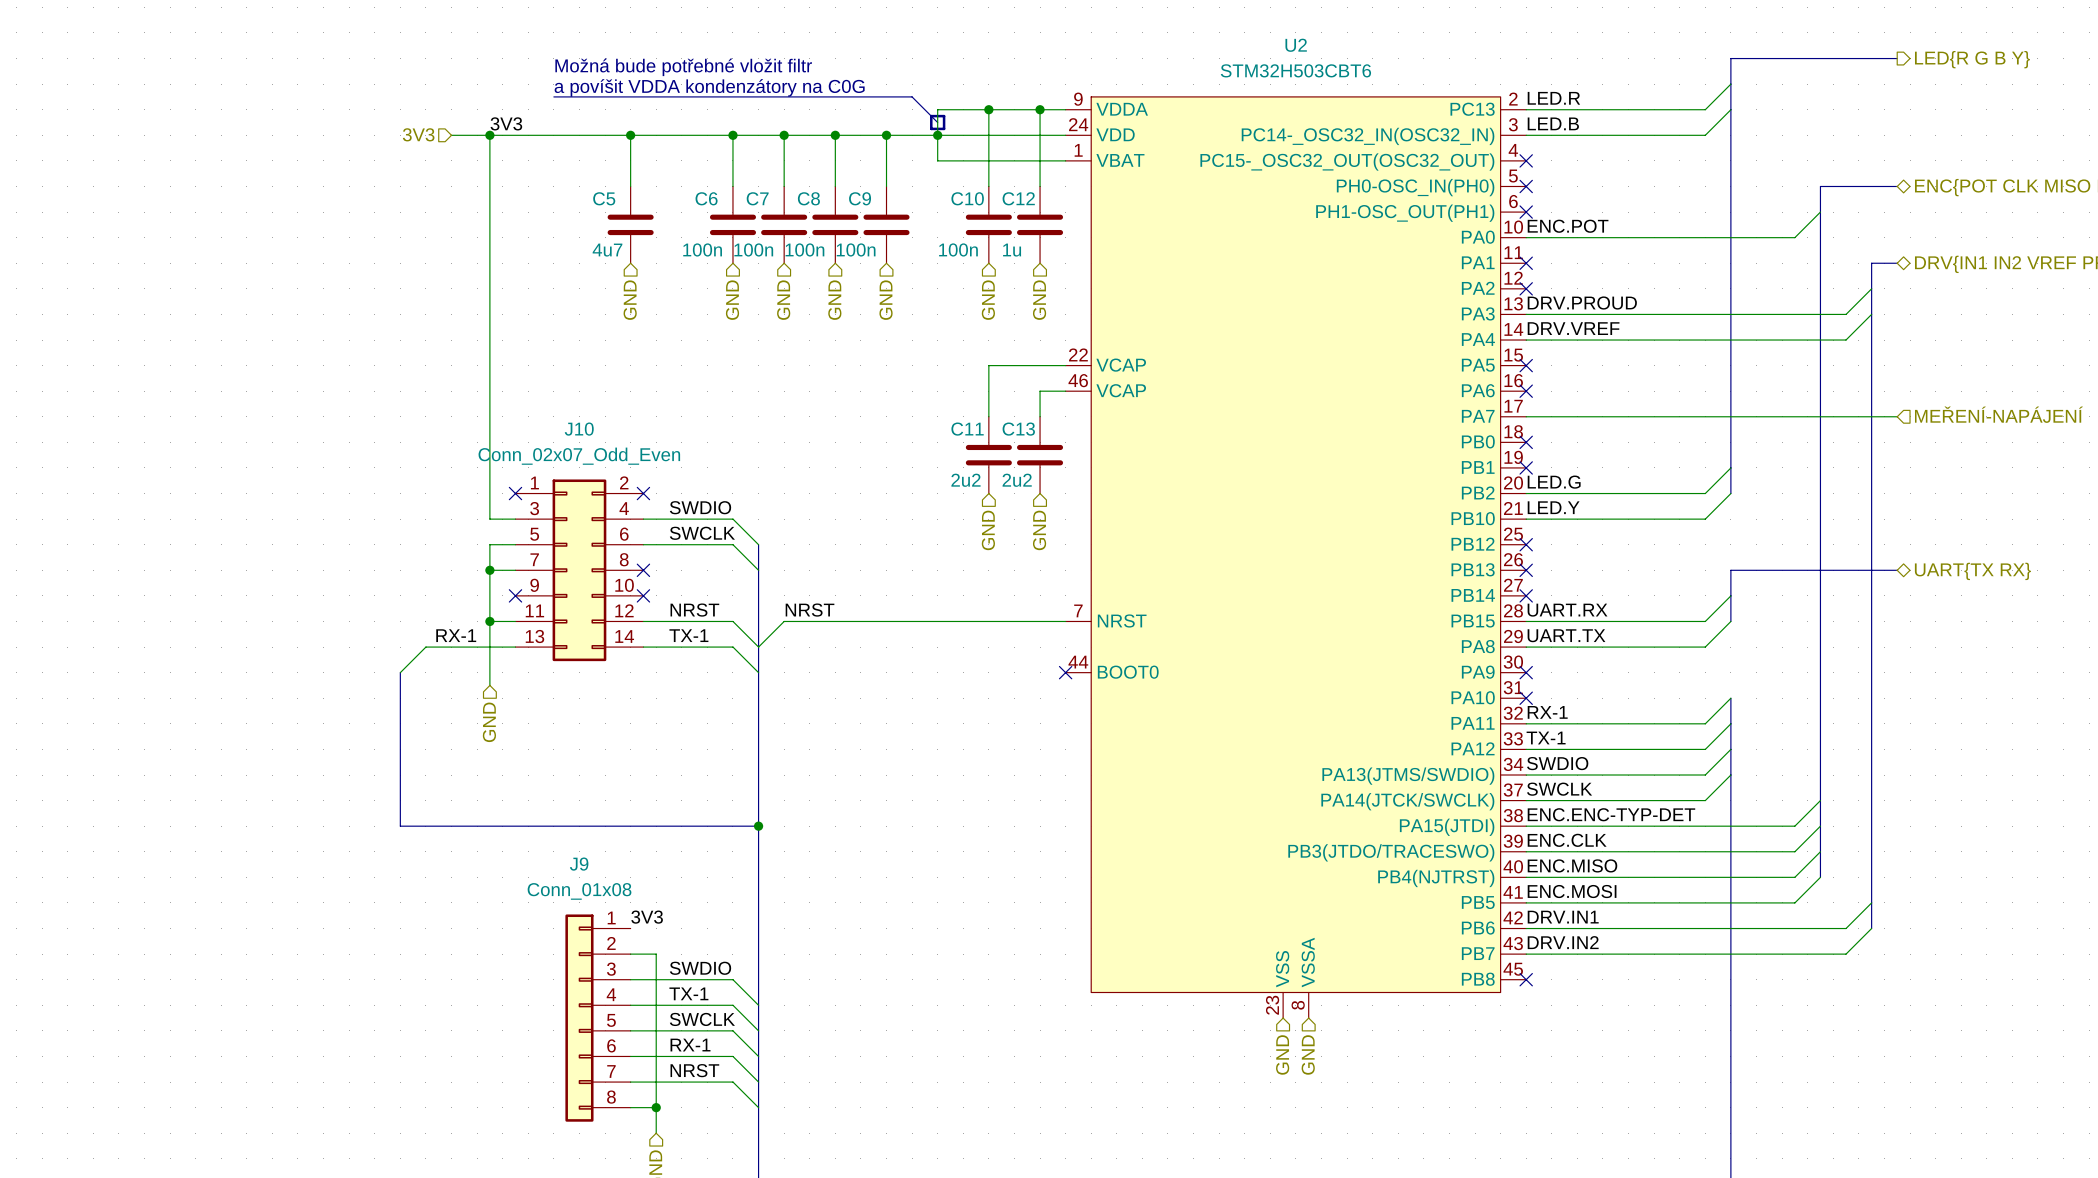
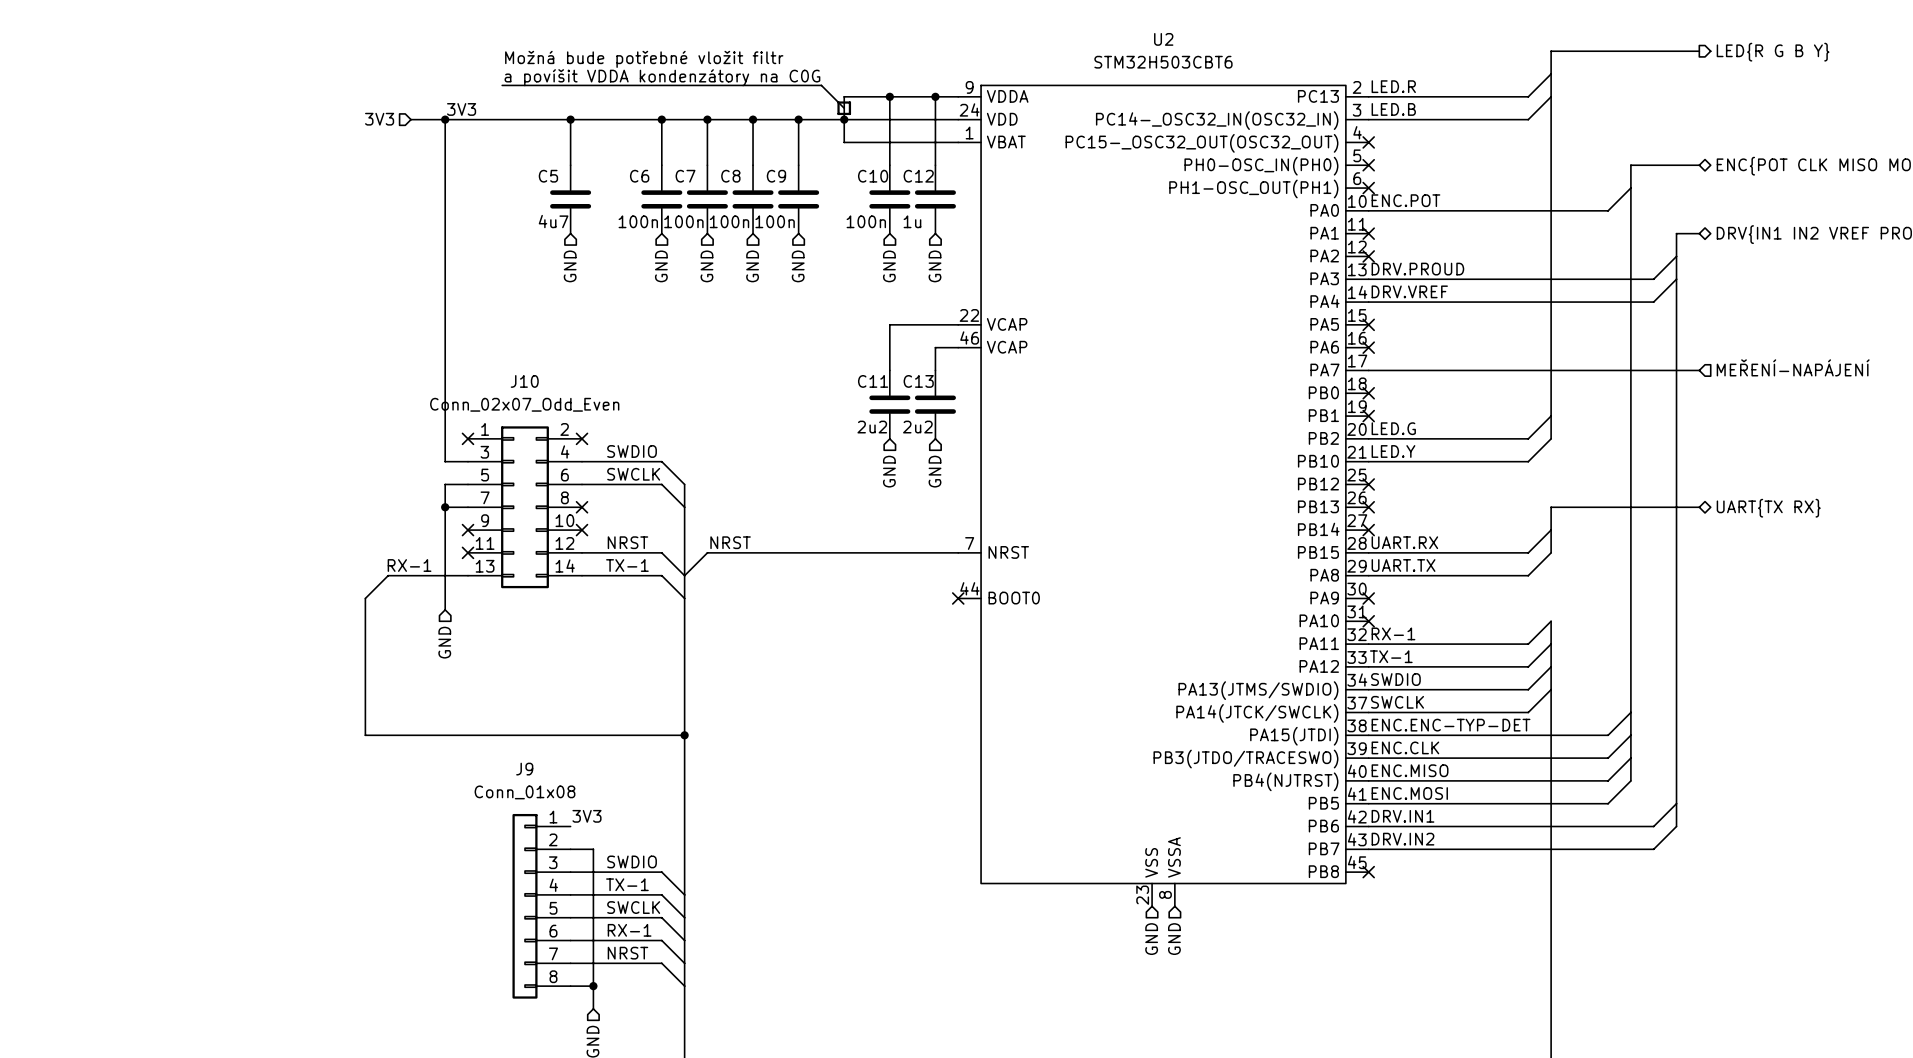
wire: (489, 621) (515, 621) -> none
junction: (489, 621) -> none
no-connect mark: none -> (467, 552)

